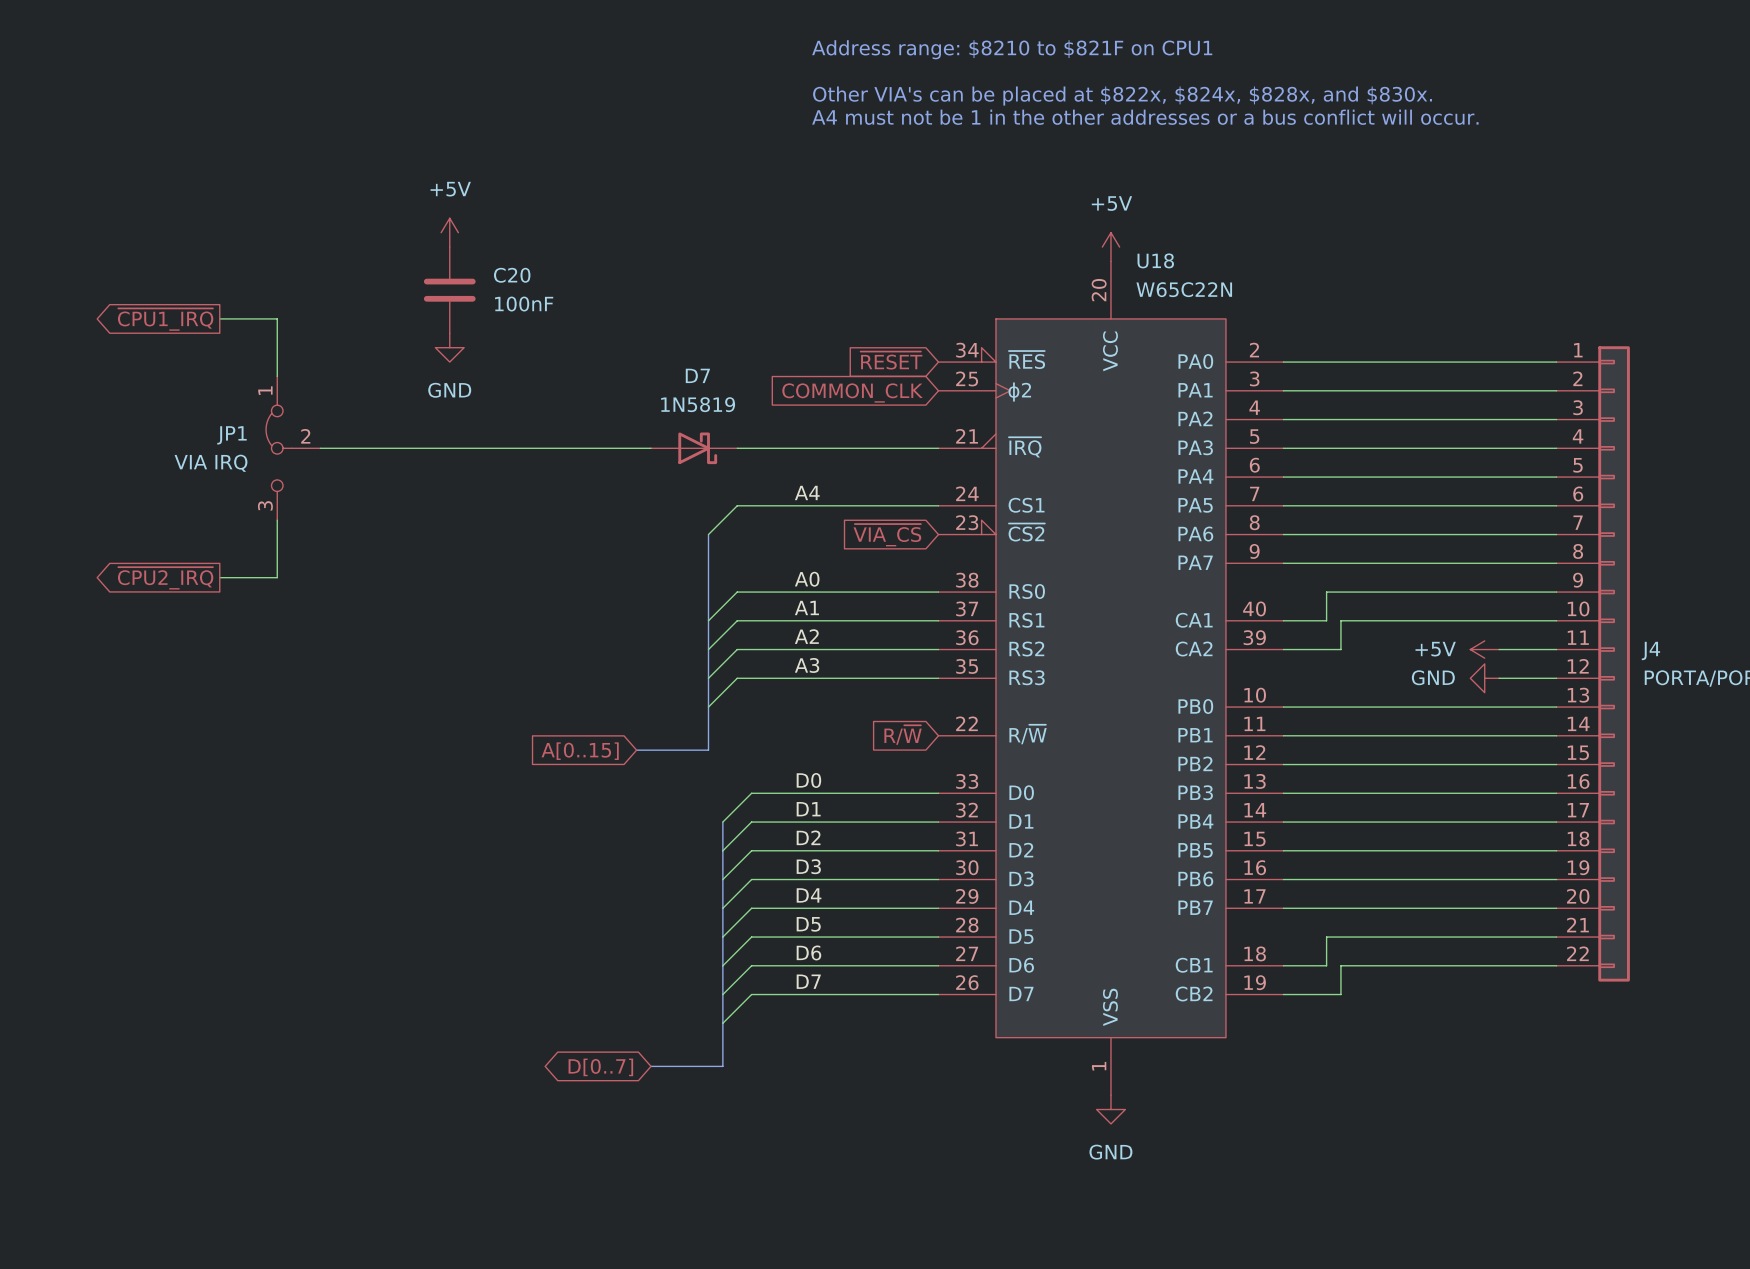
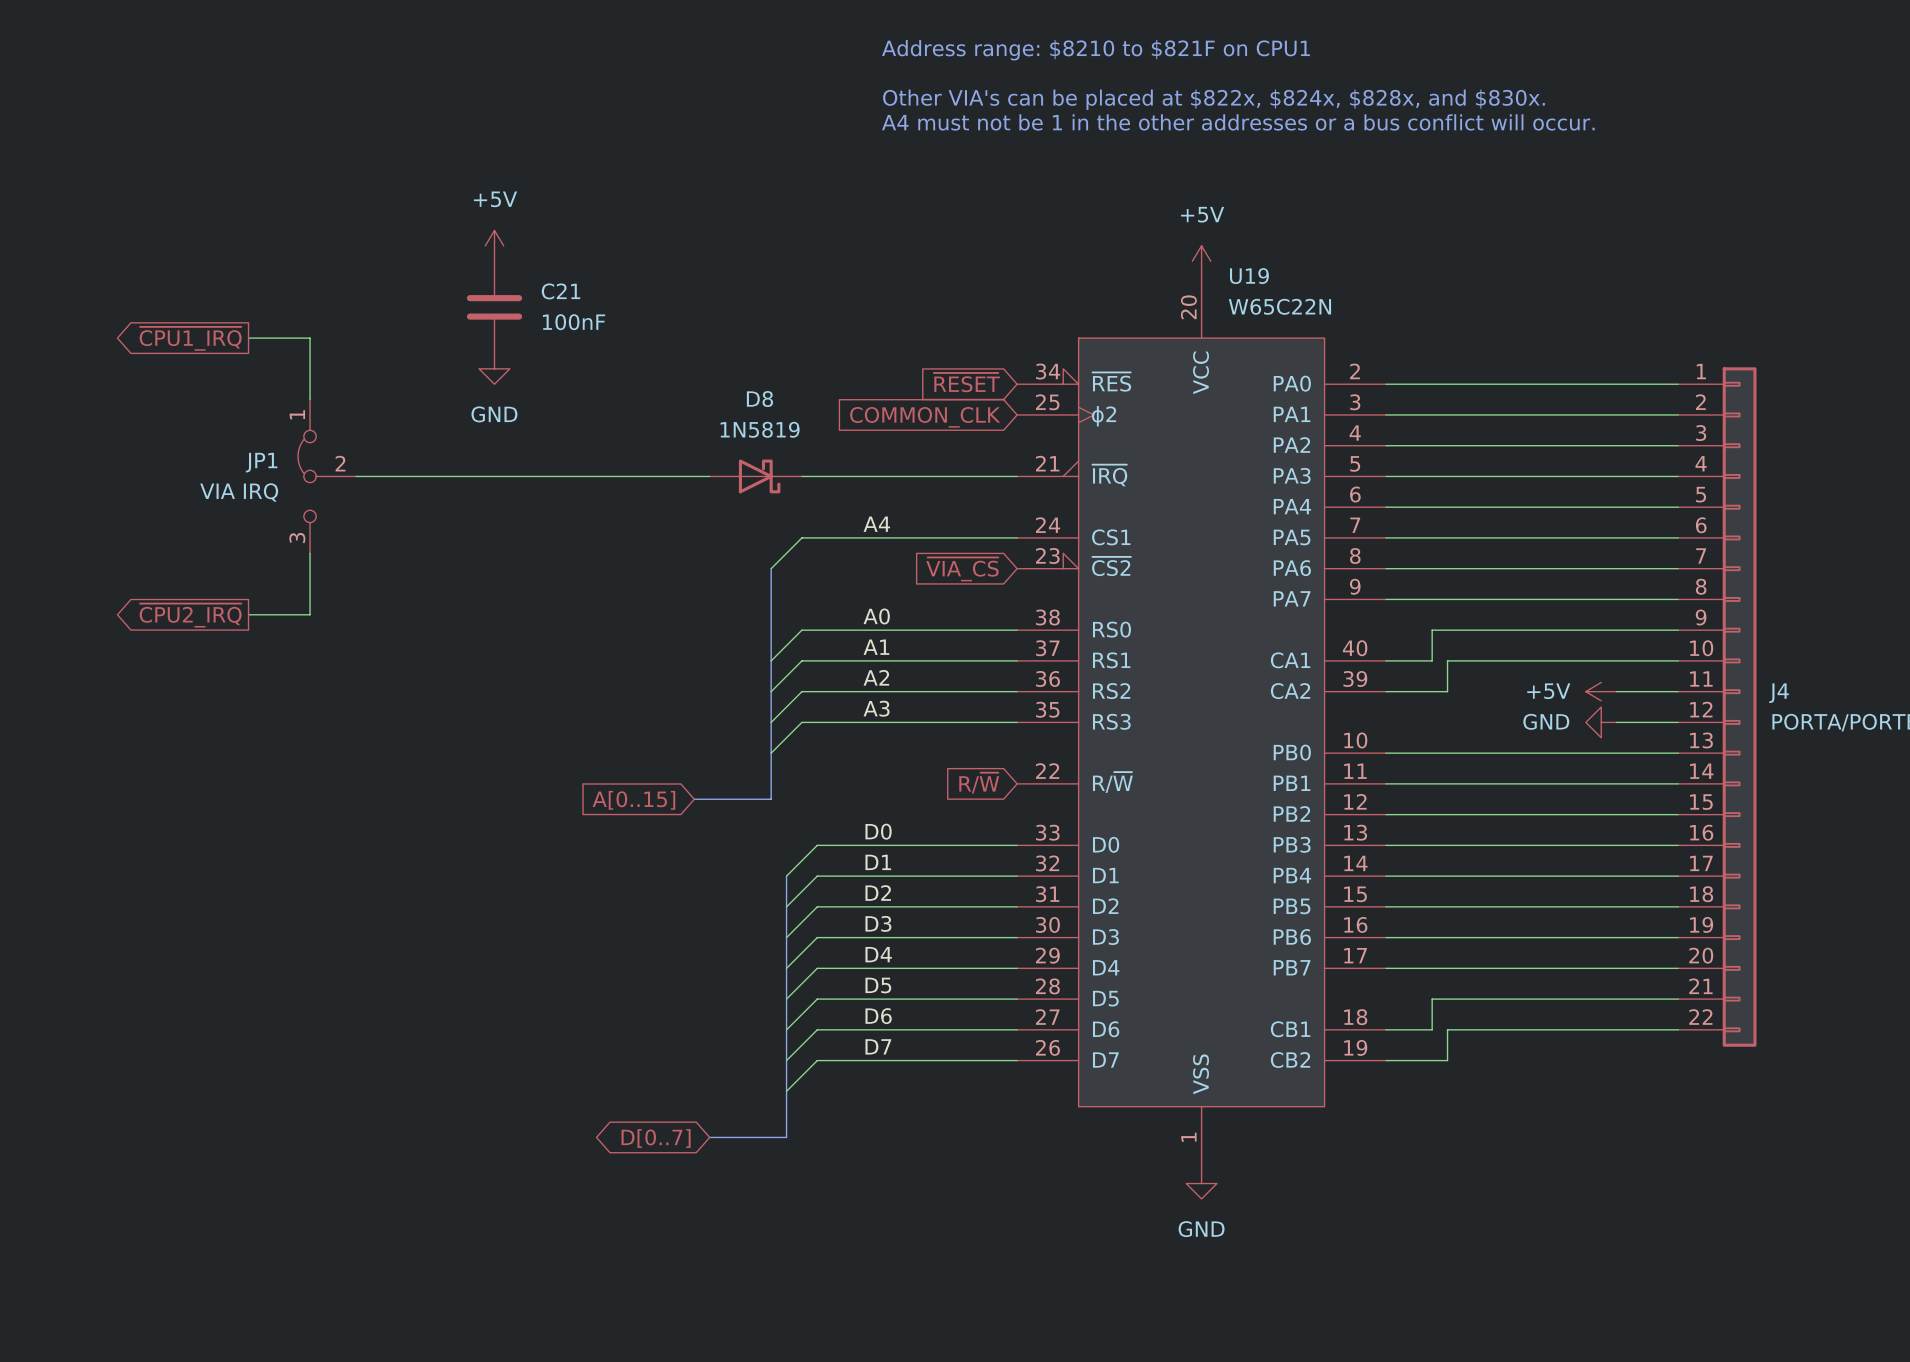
U18 name: U18 (1155, 260) -> U19 (1249, 276)
C20 name: C20 (512, 275) -> C21 (560, 291)
D7 name: D7 (697, 375) -> D8 (759, 399)

